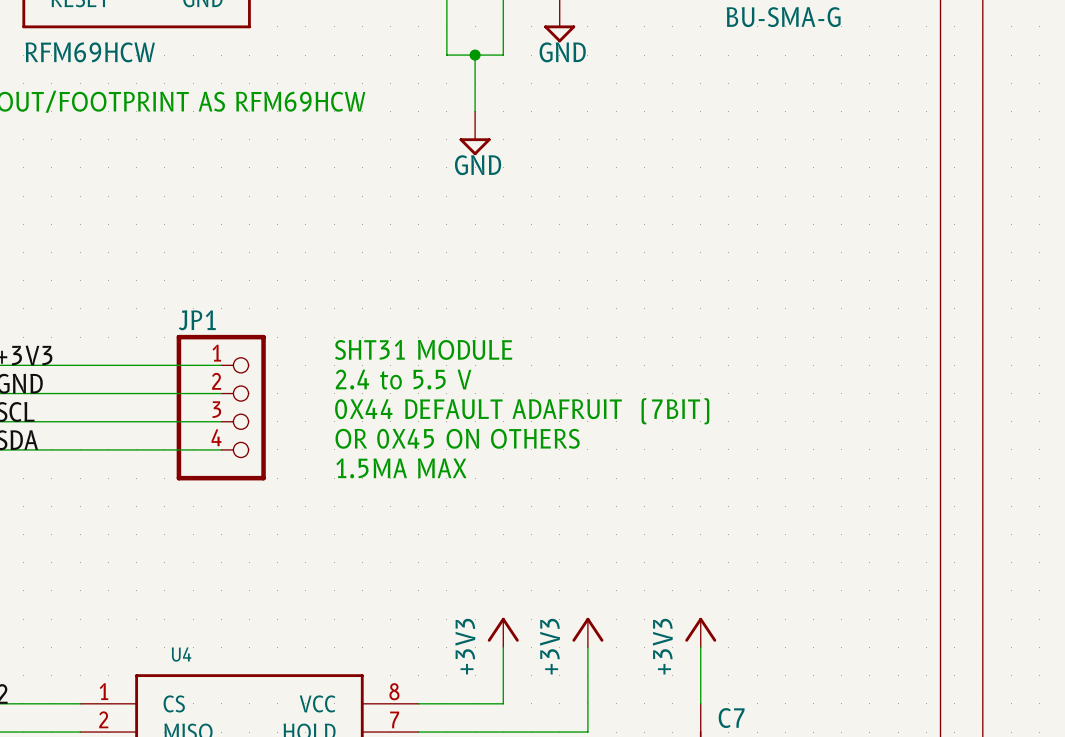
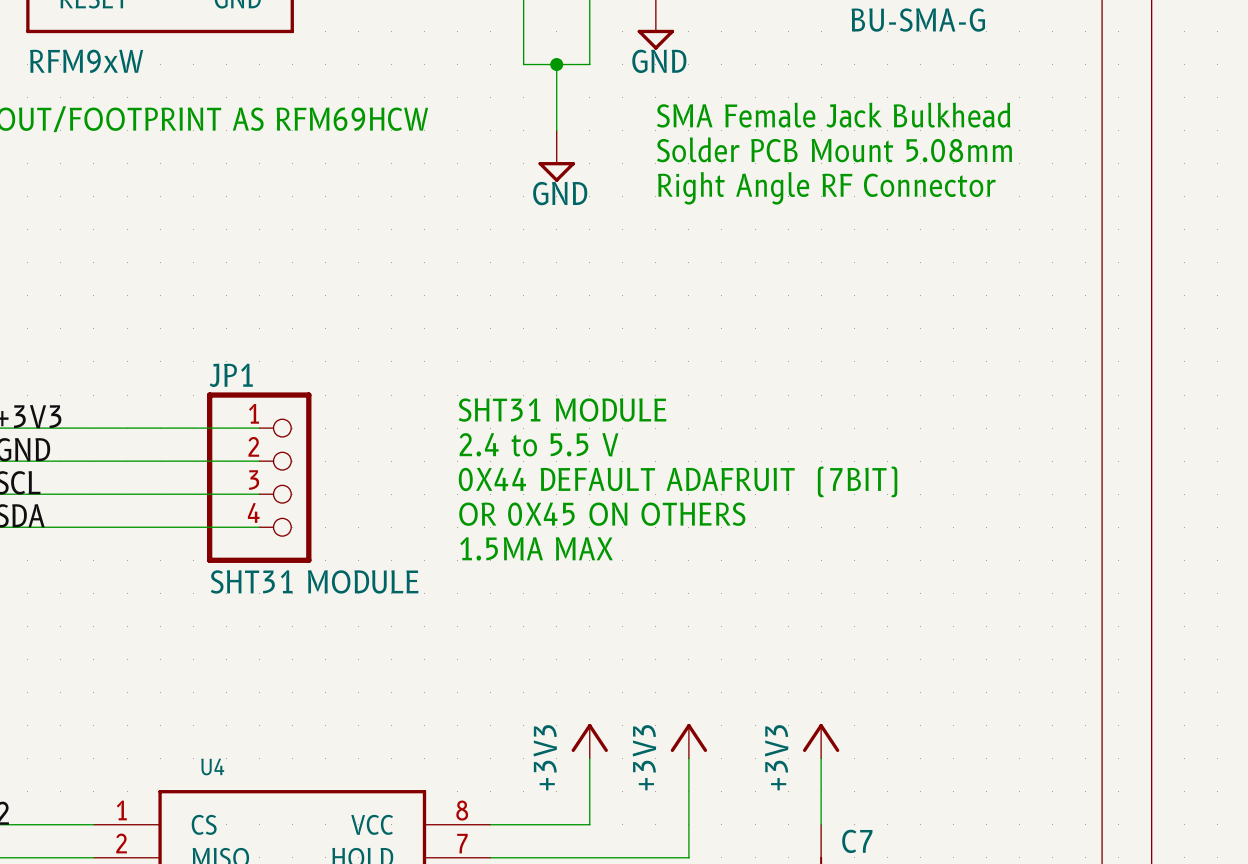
part value: RFM69HCW (90, 52) -> RFM9xW (86, 61)
text: none -> SMA Female Jack Bulkhead (833, 115)
text: none -> Solder PCB Mount 5.08mm (834, 149)
text: none -> Right Angle RF Connector (826, 188)
text position: SHT31 MODULE (423, 349) -> SHT31 MODULE (562, 410)
text position: 2.4 to 5.5 V (403, 379) -> 2.4 to 5.5 V (539, 444)
text position: 0X44 DEFAULT ADAFRUIT (7BIT) (522, 411) -> 0X44 DEFAULT ADAFRUIT (7BIT) (678, 481)
text position: OR 0X45 ON OTHERS (457, 438) -> OR 0X45 ON OTHERS (602, 514)
text position: 1.5MA MAX (401, 468) -> 1.5MA MAX (536, 548)
JP1 value: none -> SHT31 MODULE (314, 581)

